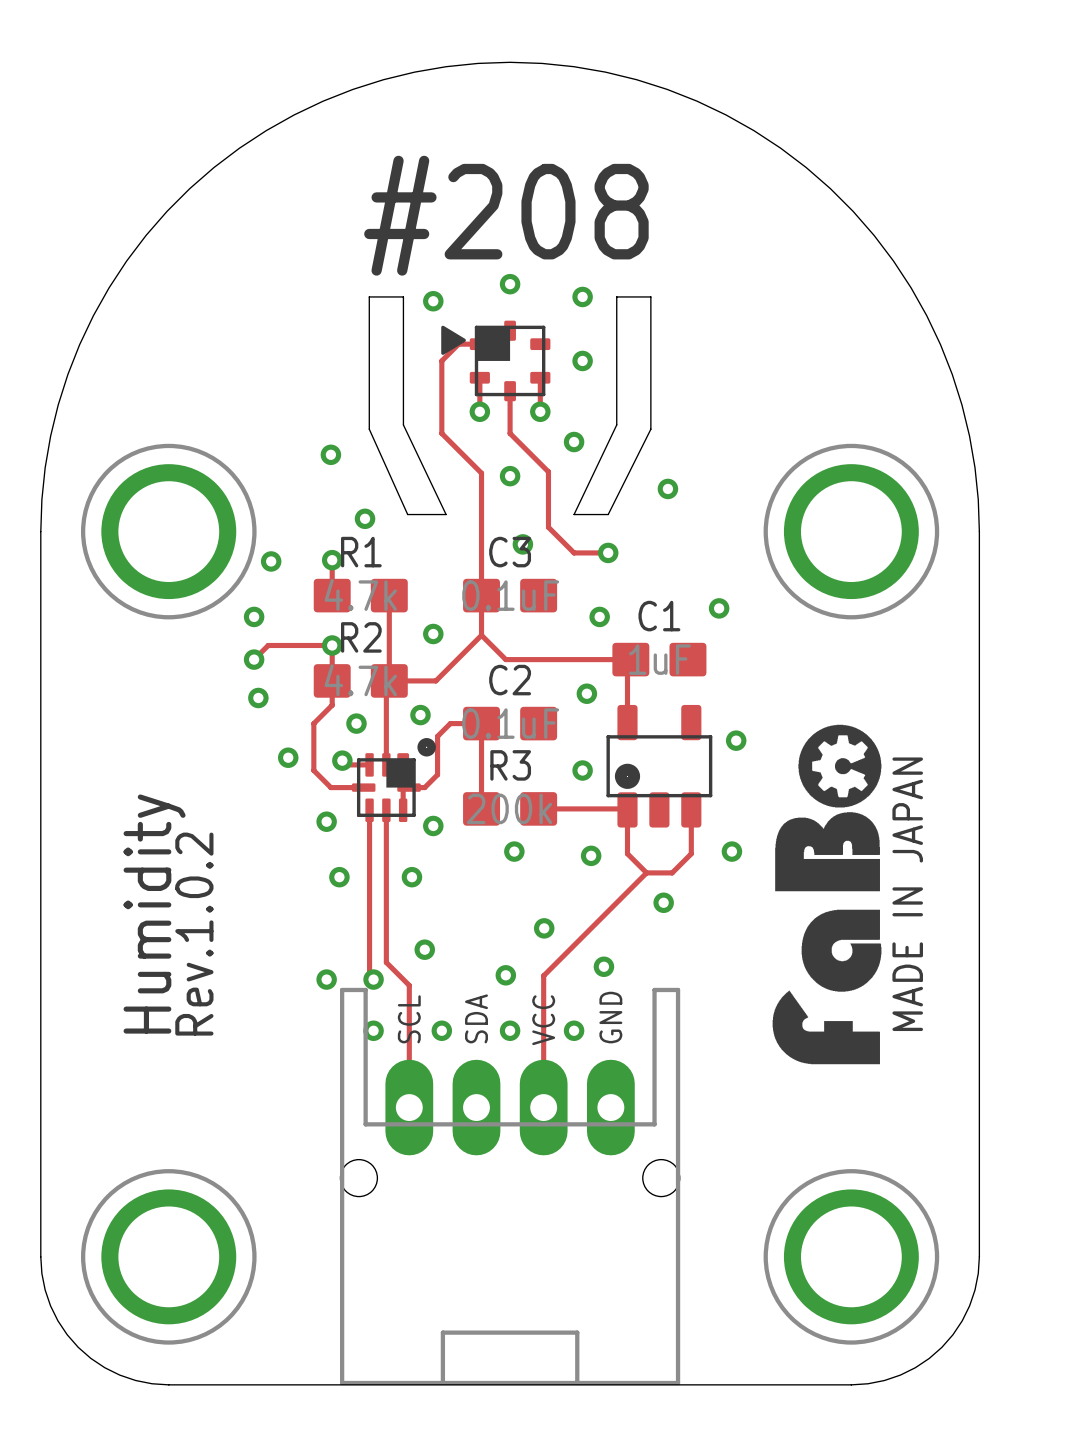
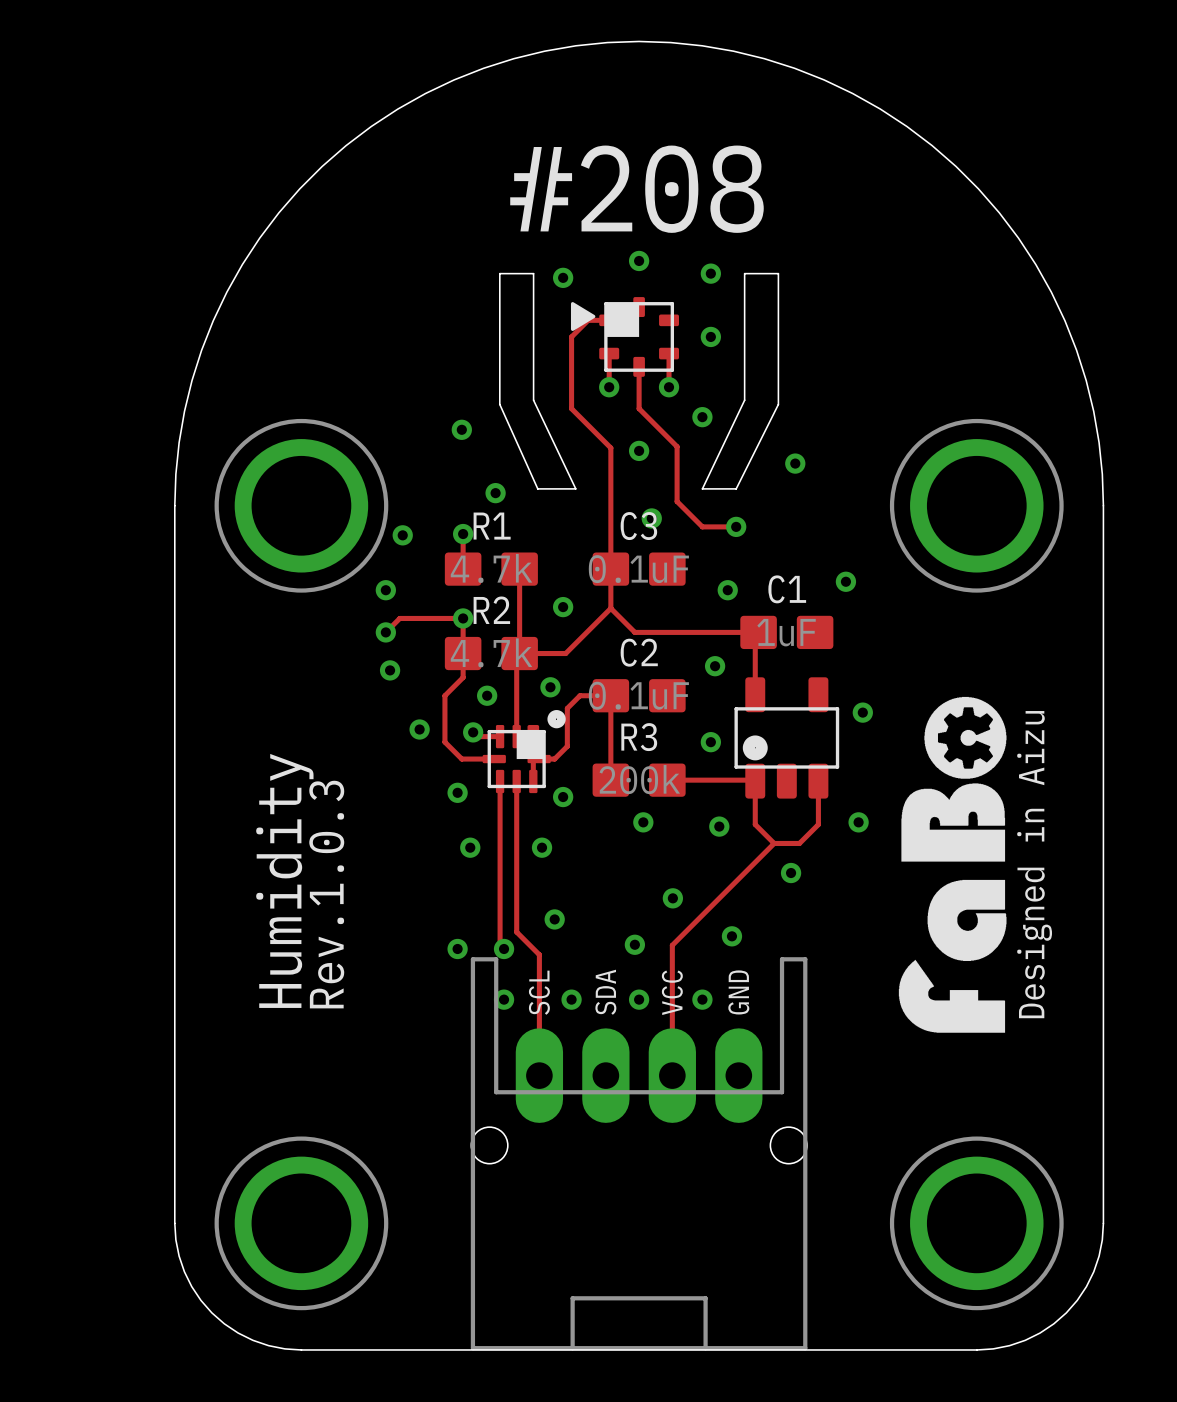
text: MADE IN JAPAN (907, 894) -> Designed in Aizu (1034, 864)
text: Rev.1.0.2 (194, 934) -> Rev.1.0.3 (326, 894)

